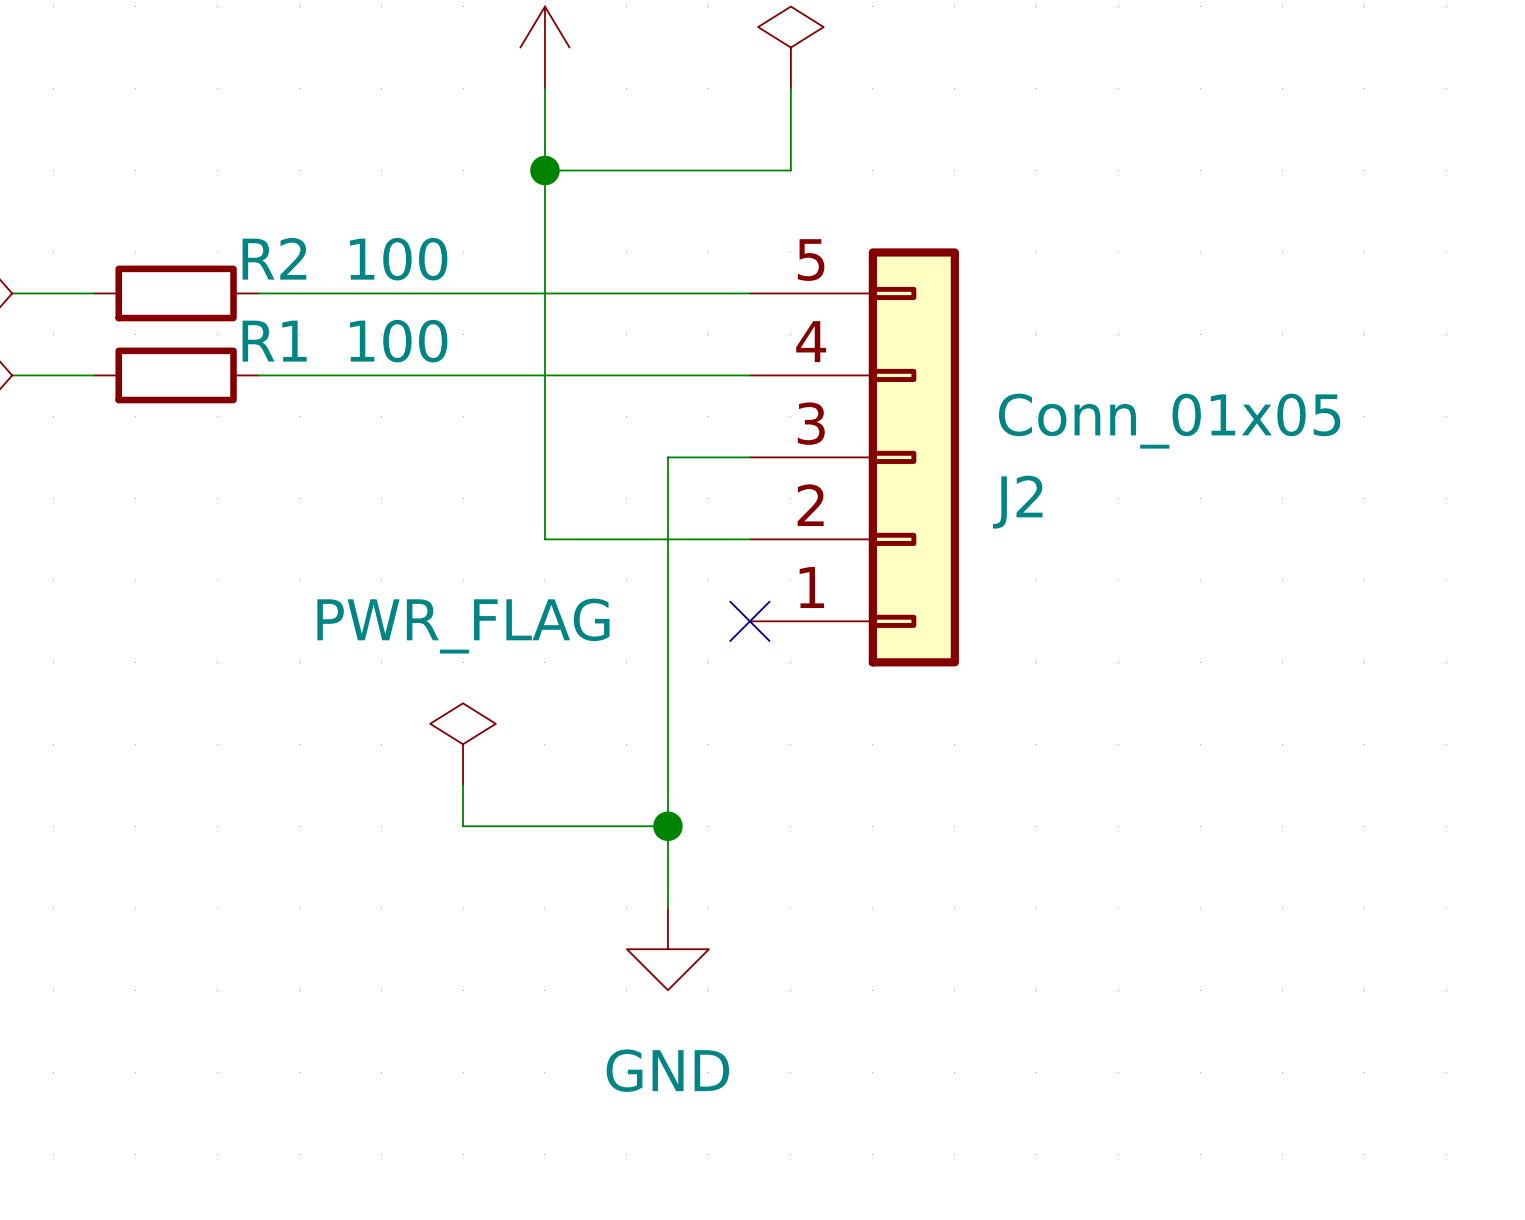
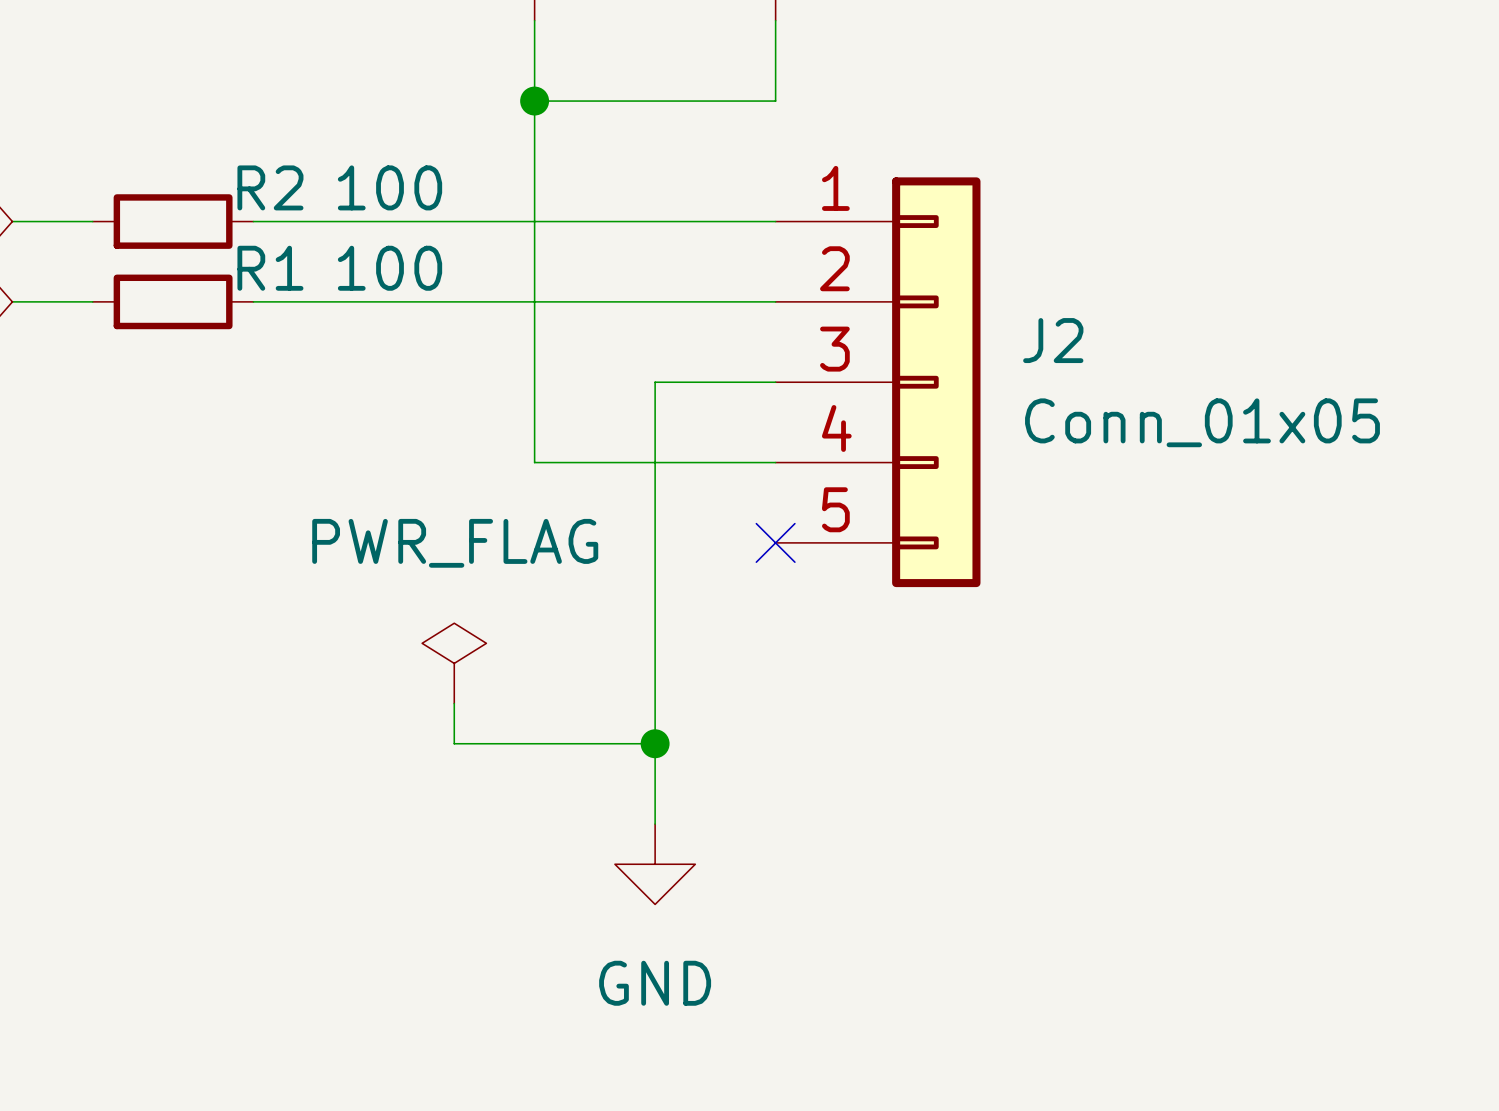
J2 flip: as is (913, 457) -> up-down (936, 382)
no-connect mark position: (749, 621) -> (775, 542)

